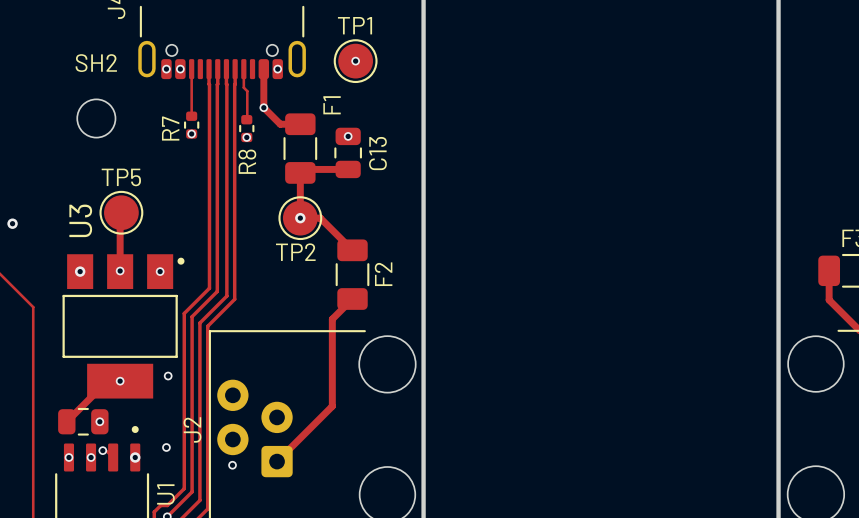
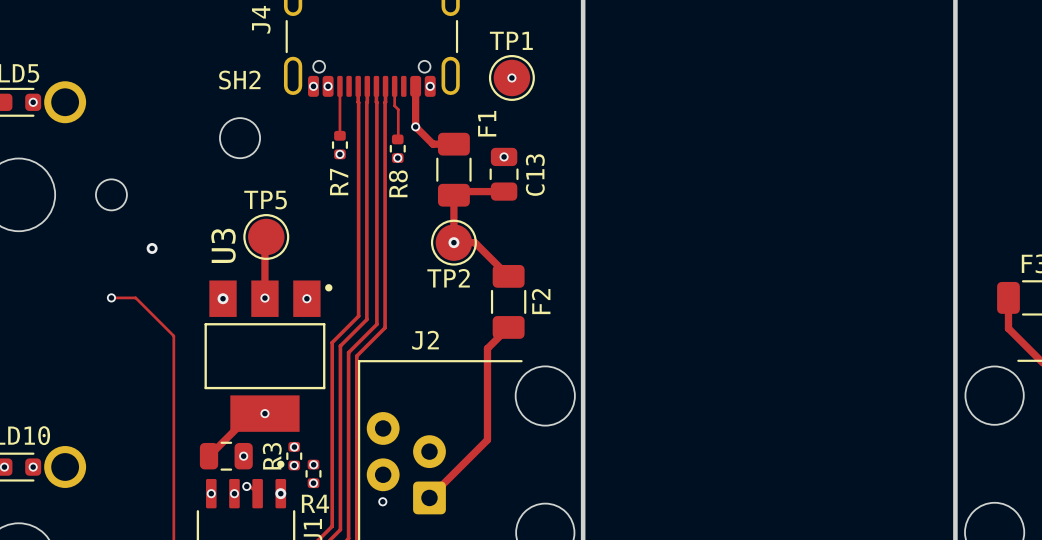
R7 name position: R7 (170, 128) -> R7 (339, 181)
via: (168, 376) -> none
via: none -> (294, 447)
R3: none -> (294, 456)
via: none -> (313, 464)
J2 name rotation: 0° (192, 429) -> 90° clockwise (425, 340)
J2 name position: J2 (192, 429) -> J2 (425, 340)
via: none -> (294, 465)
R4: none -> (313, 473)

